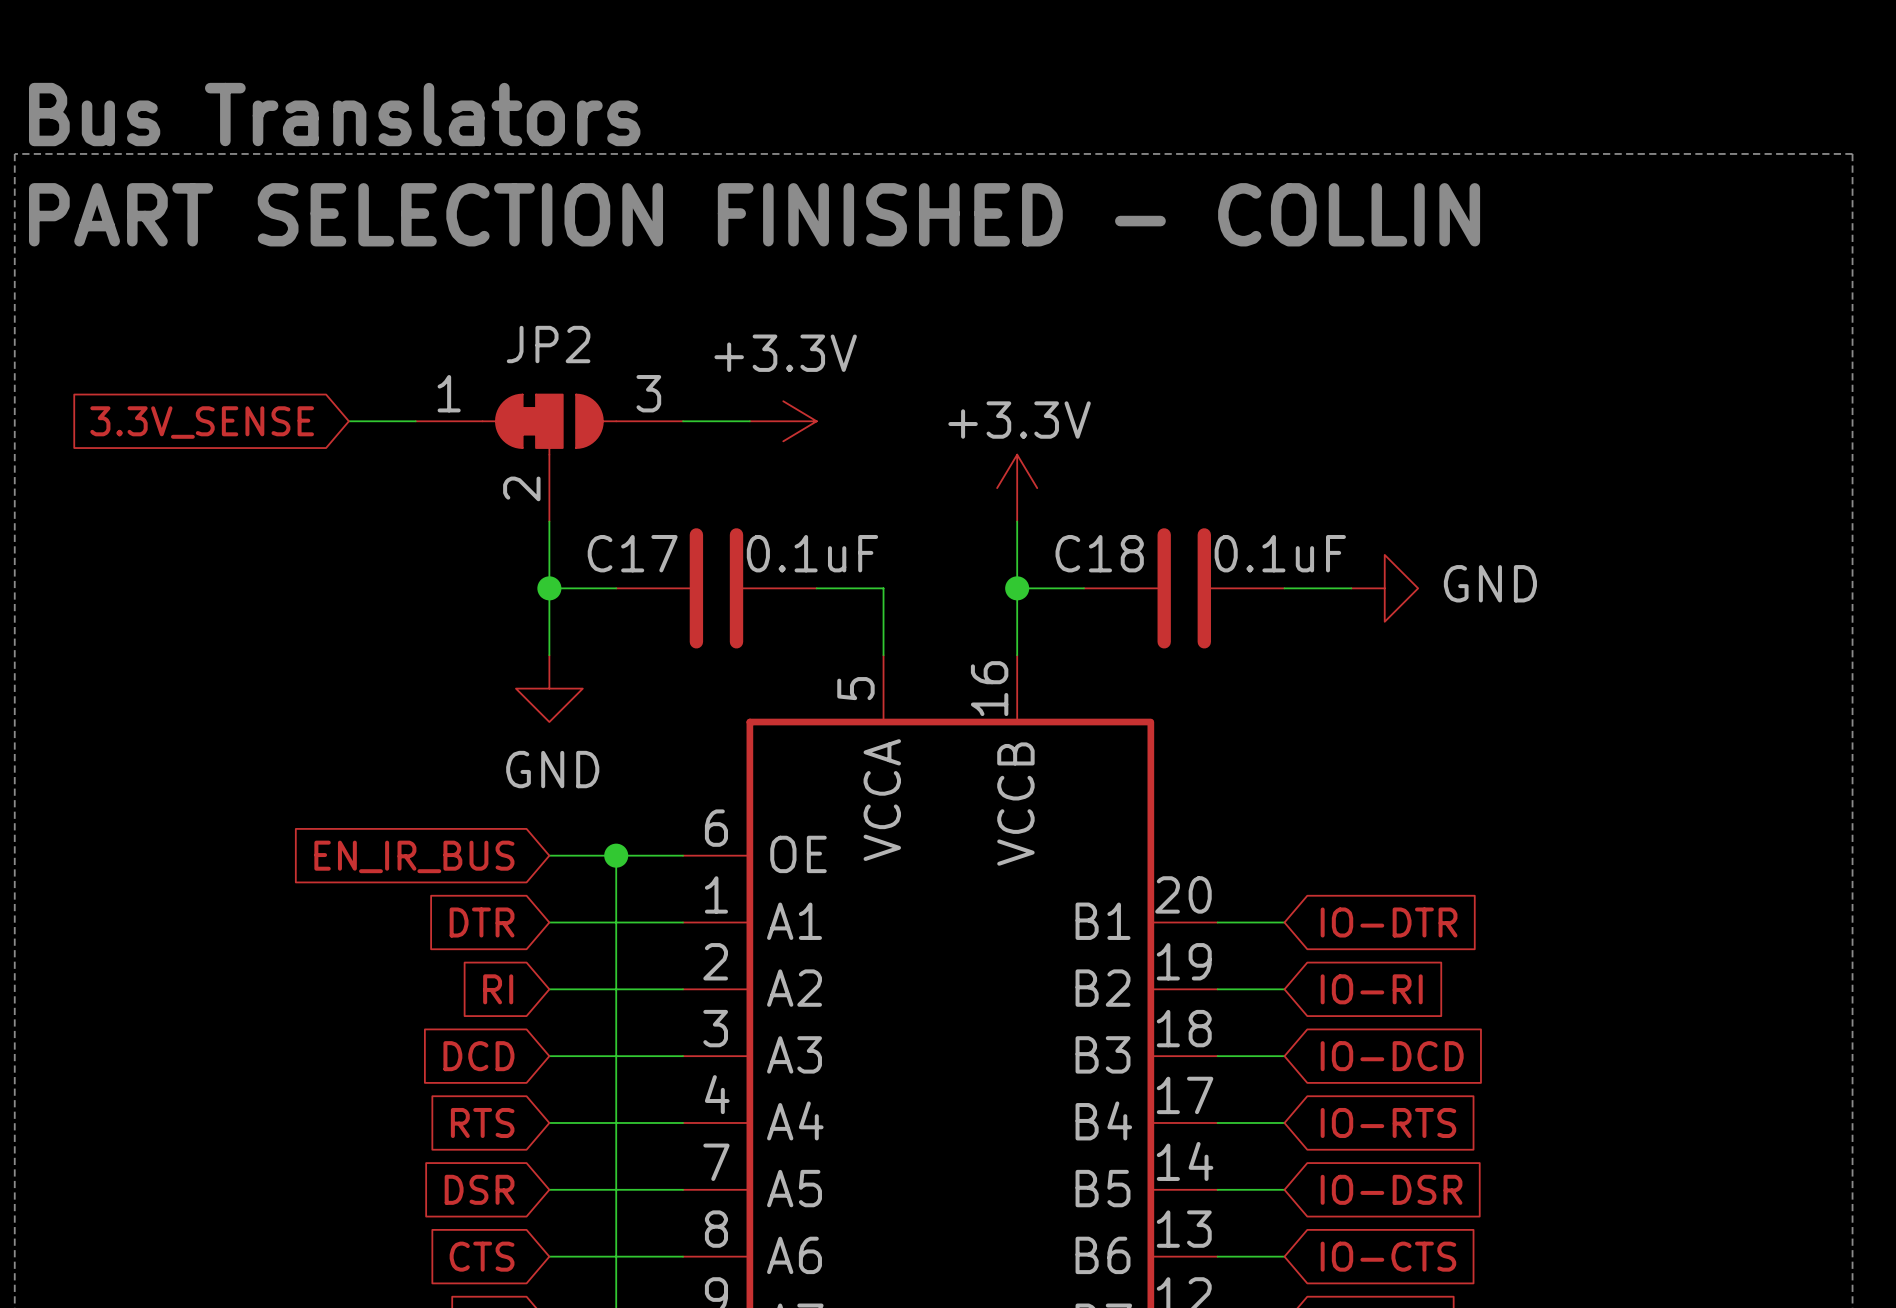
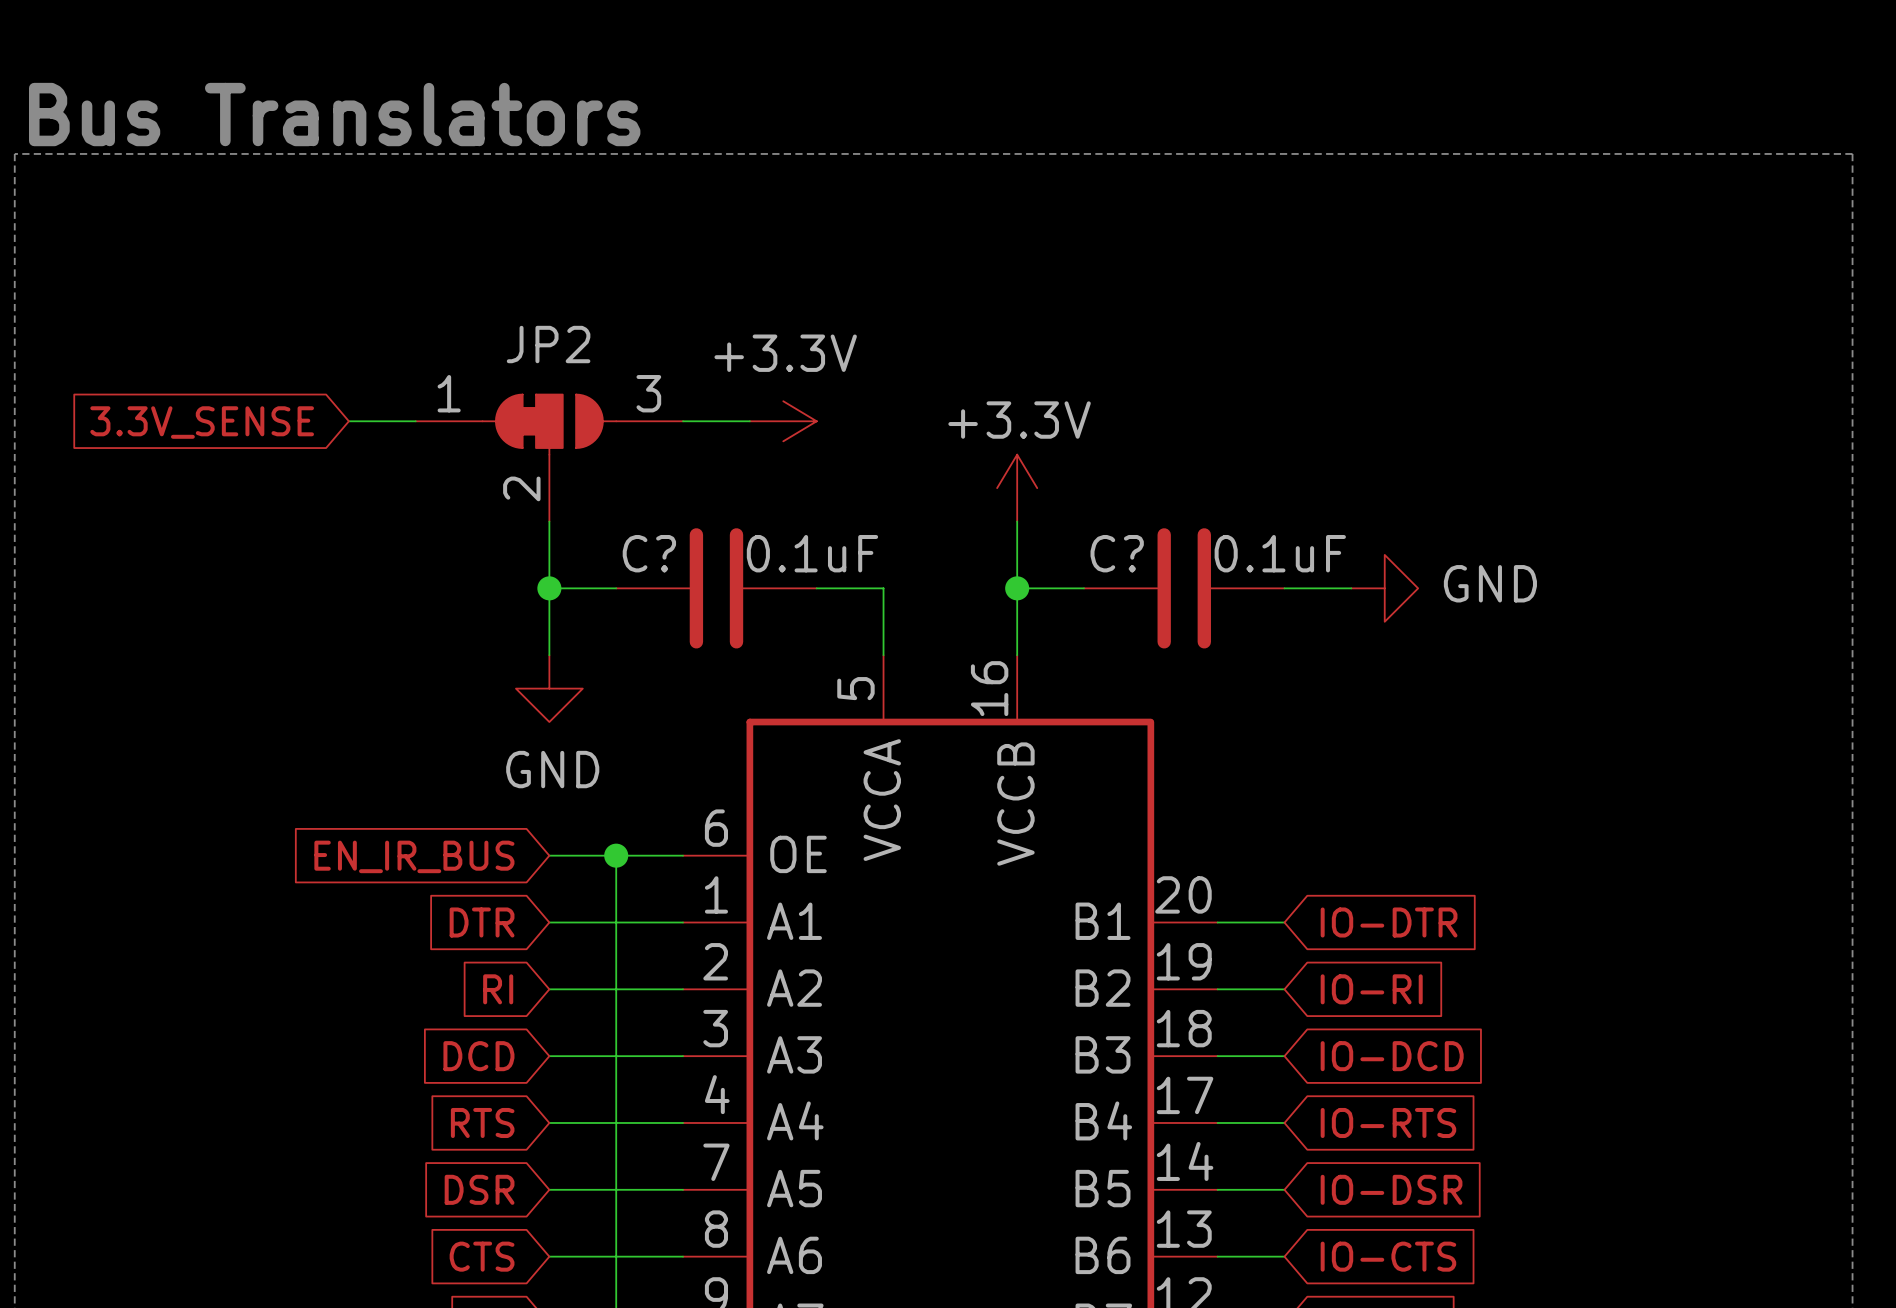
text: PART SELECTION FINISHED - COLLIN (754, 214) -> none
C17 name: C17 (632, 553) -> C? (649, 553)
C18 name: C18 (1099, 553) -> C? (1117, 553)

